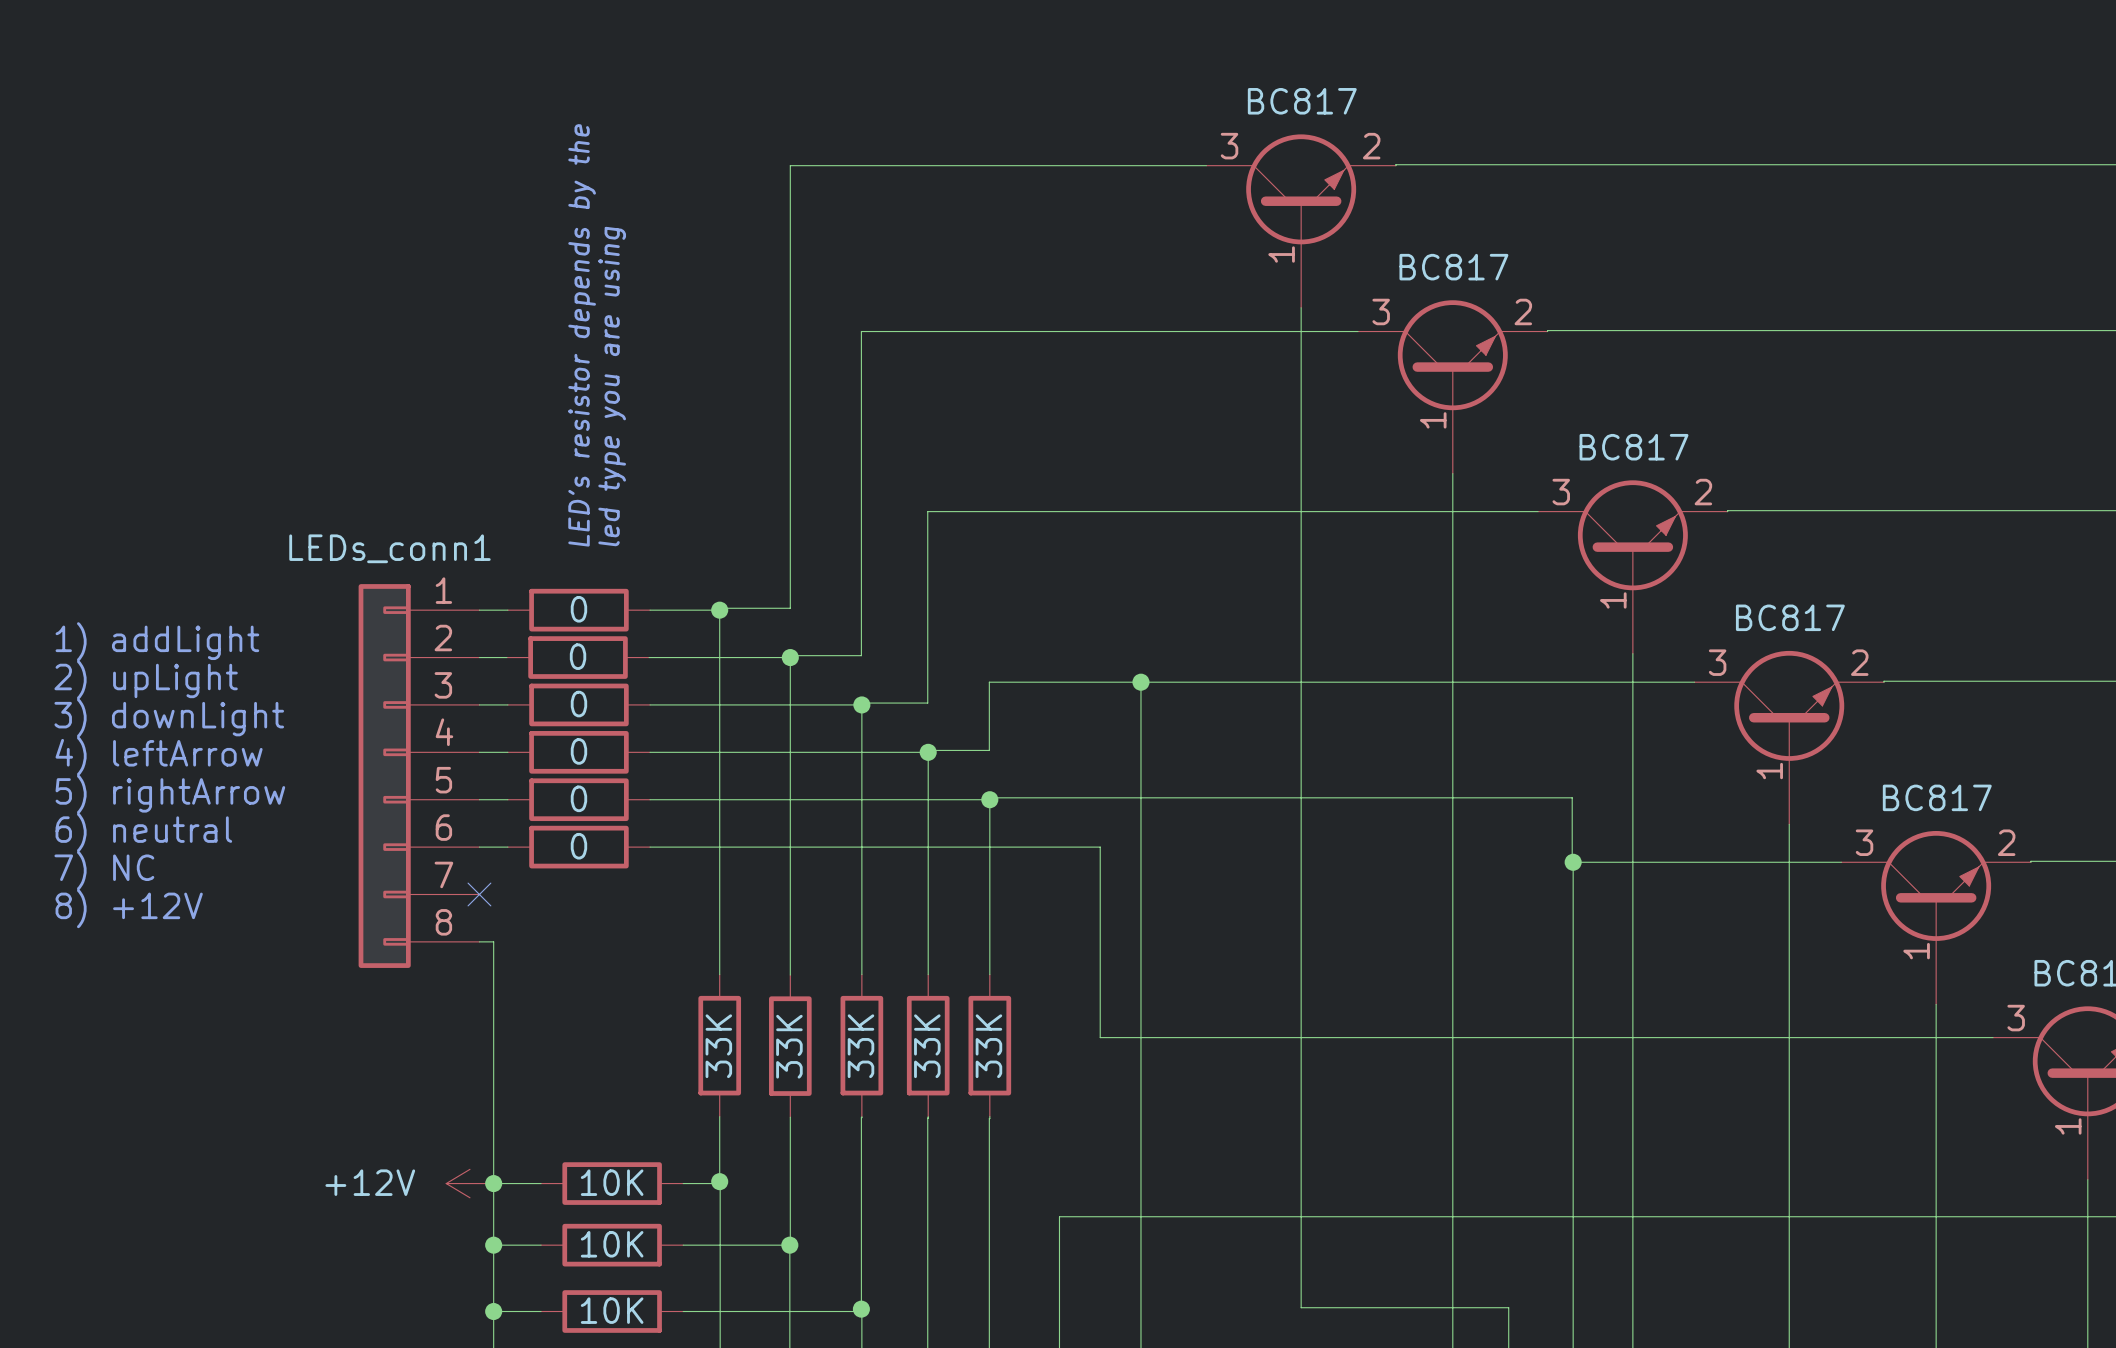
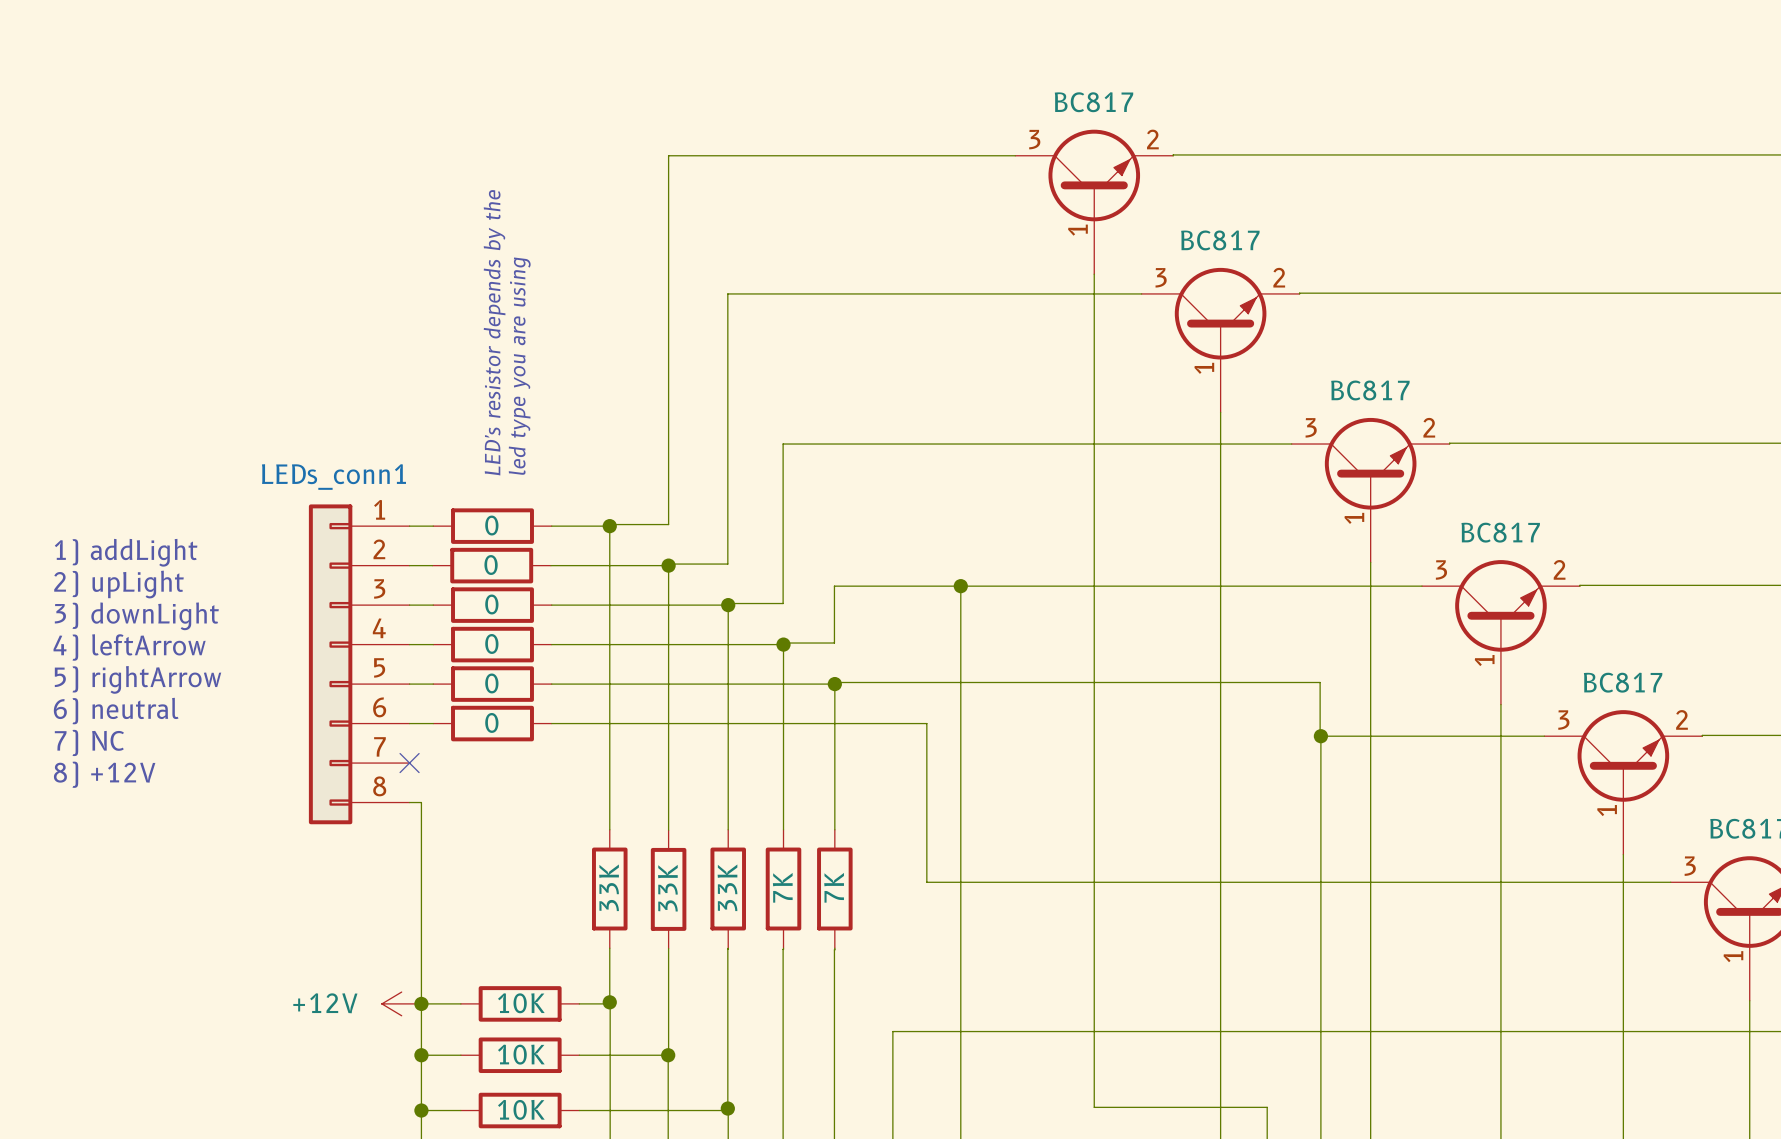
part value: 33K (927, 1046) -> 7K (782, 887)
part value: 33K (988, 1046) -> 7K (834, 887)

